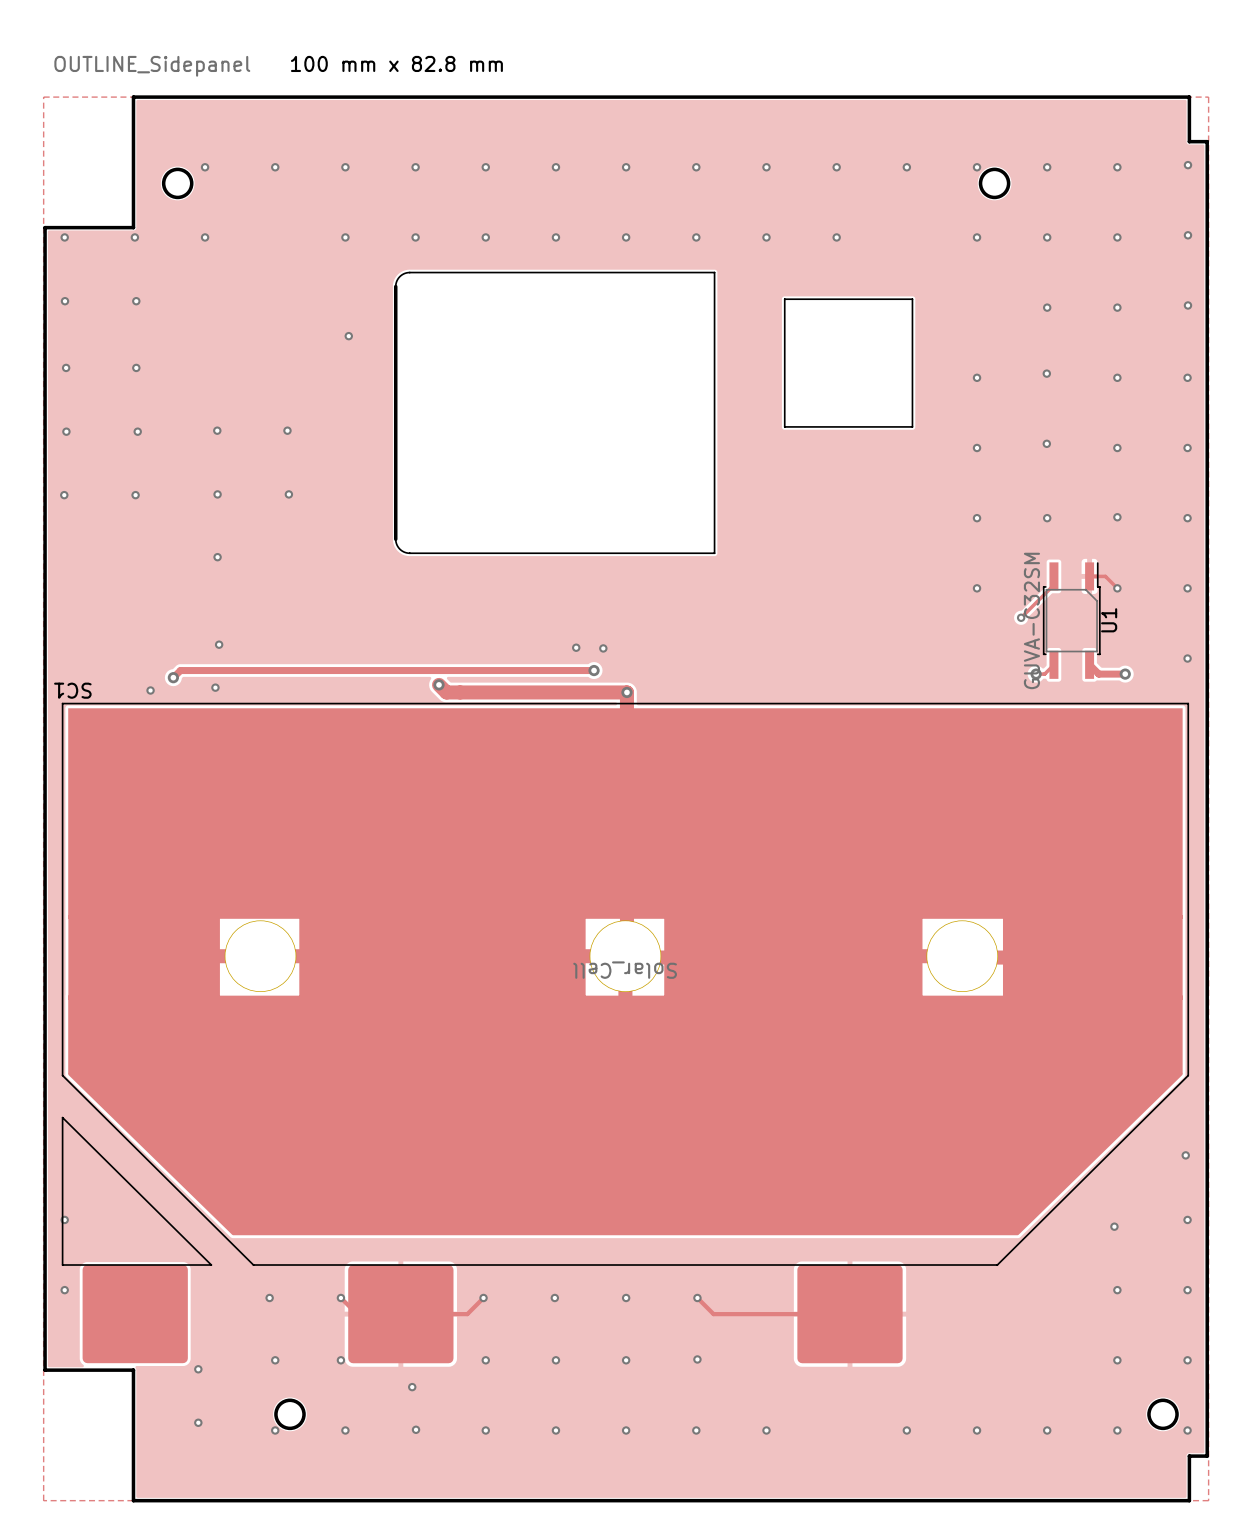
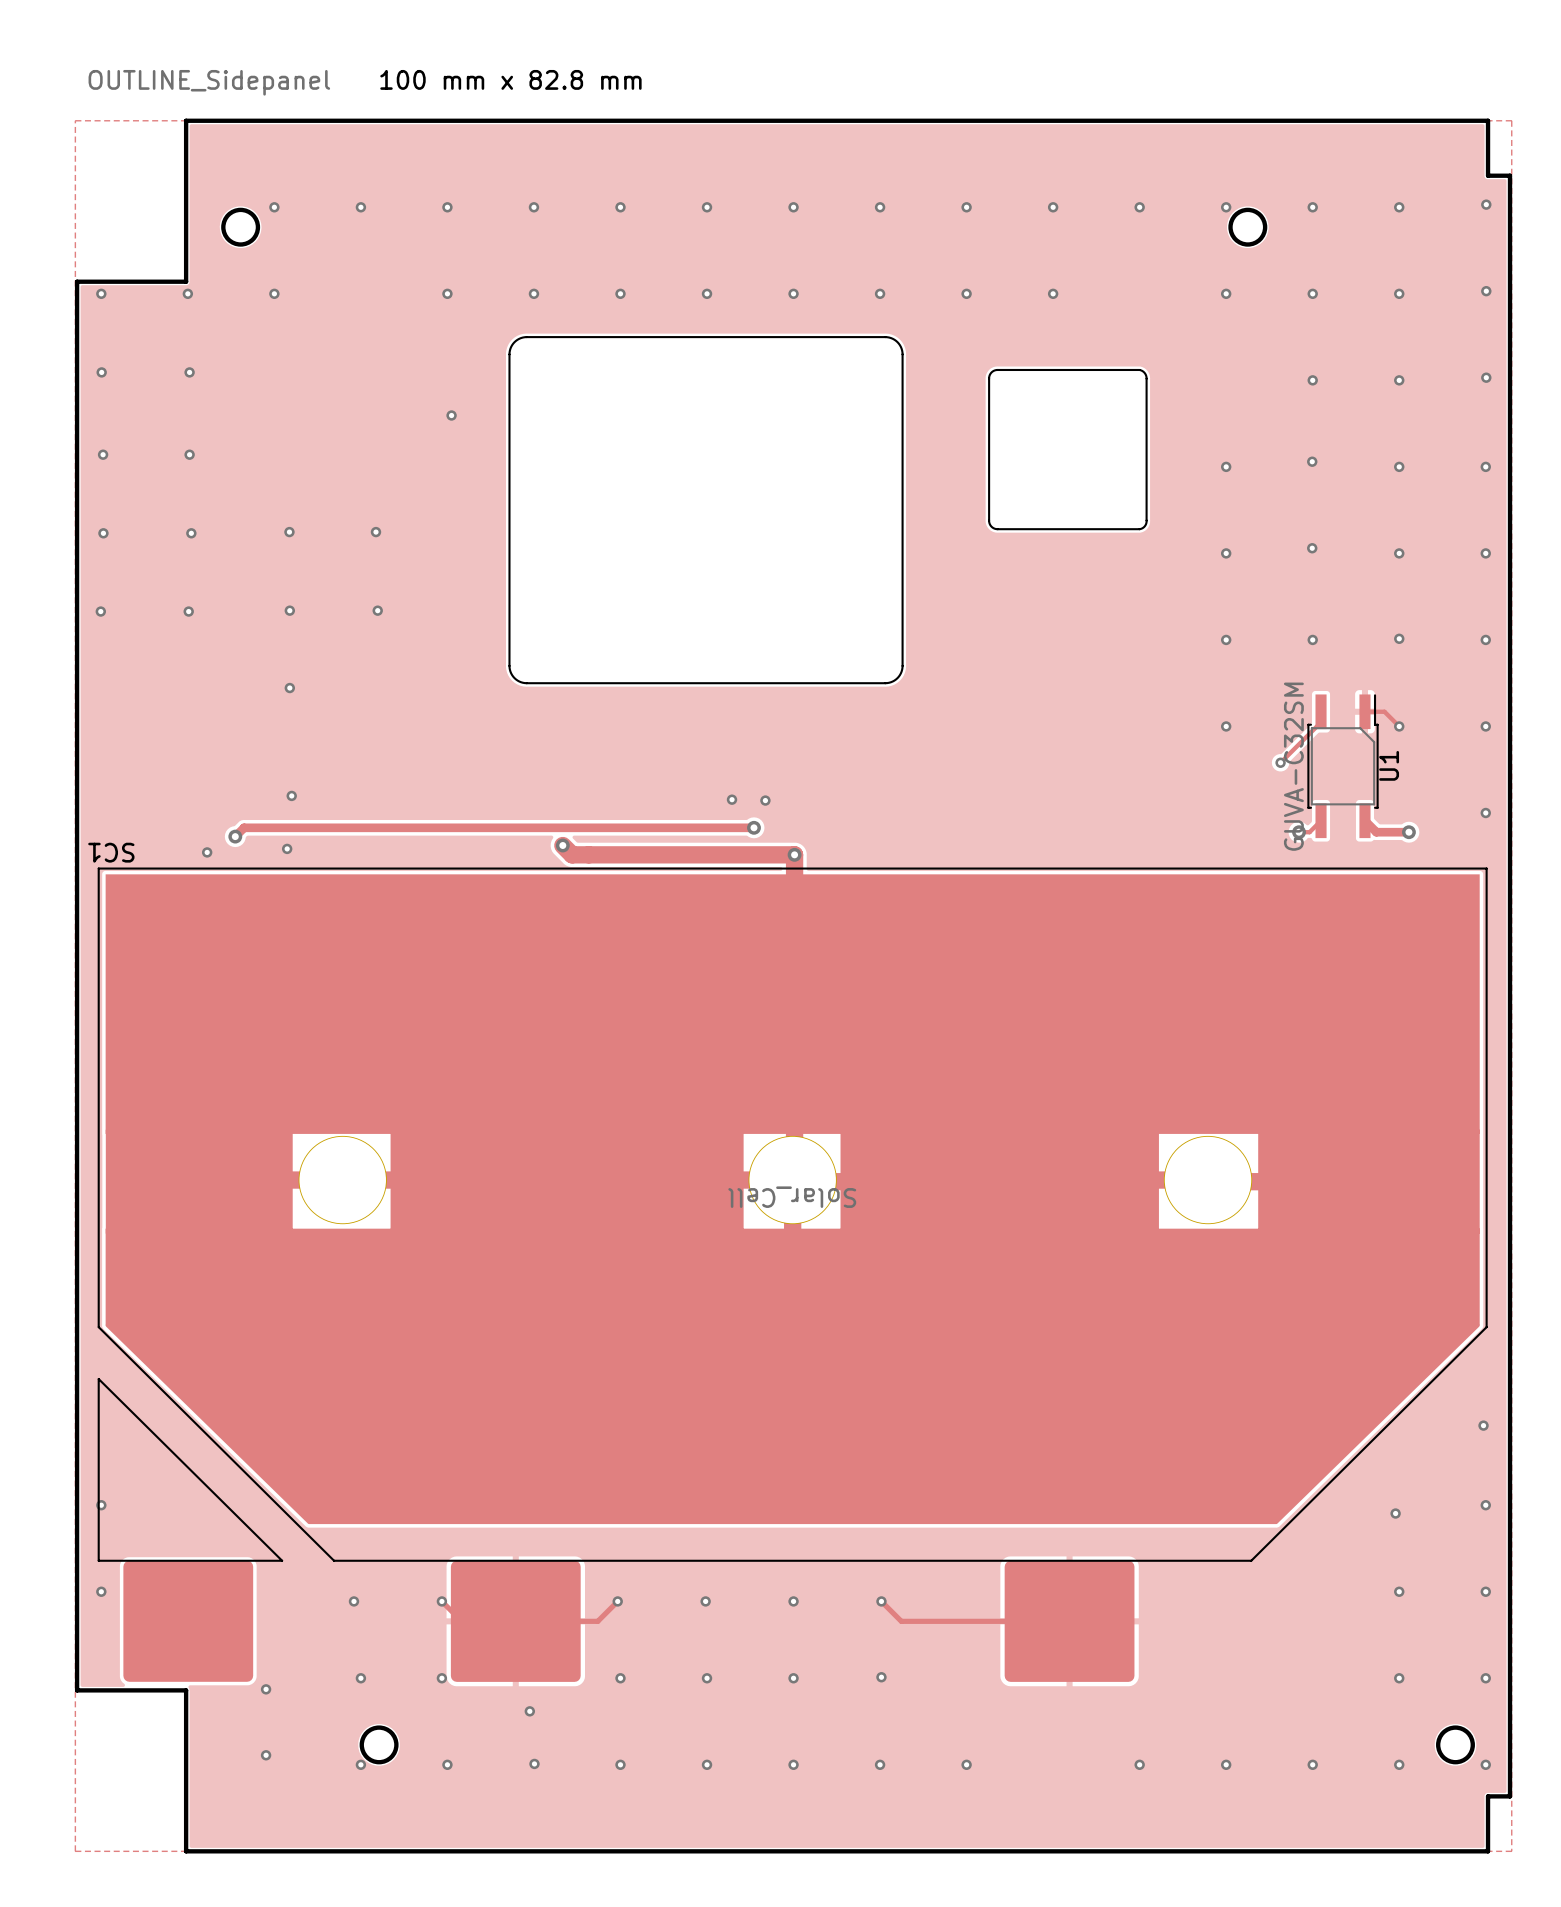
drawing shape: [43, 55, 1209, 1503] -> [74, 69, 1513, 1854]

